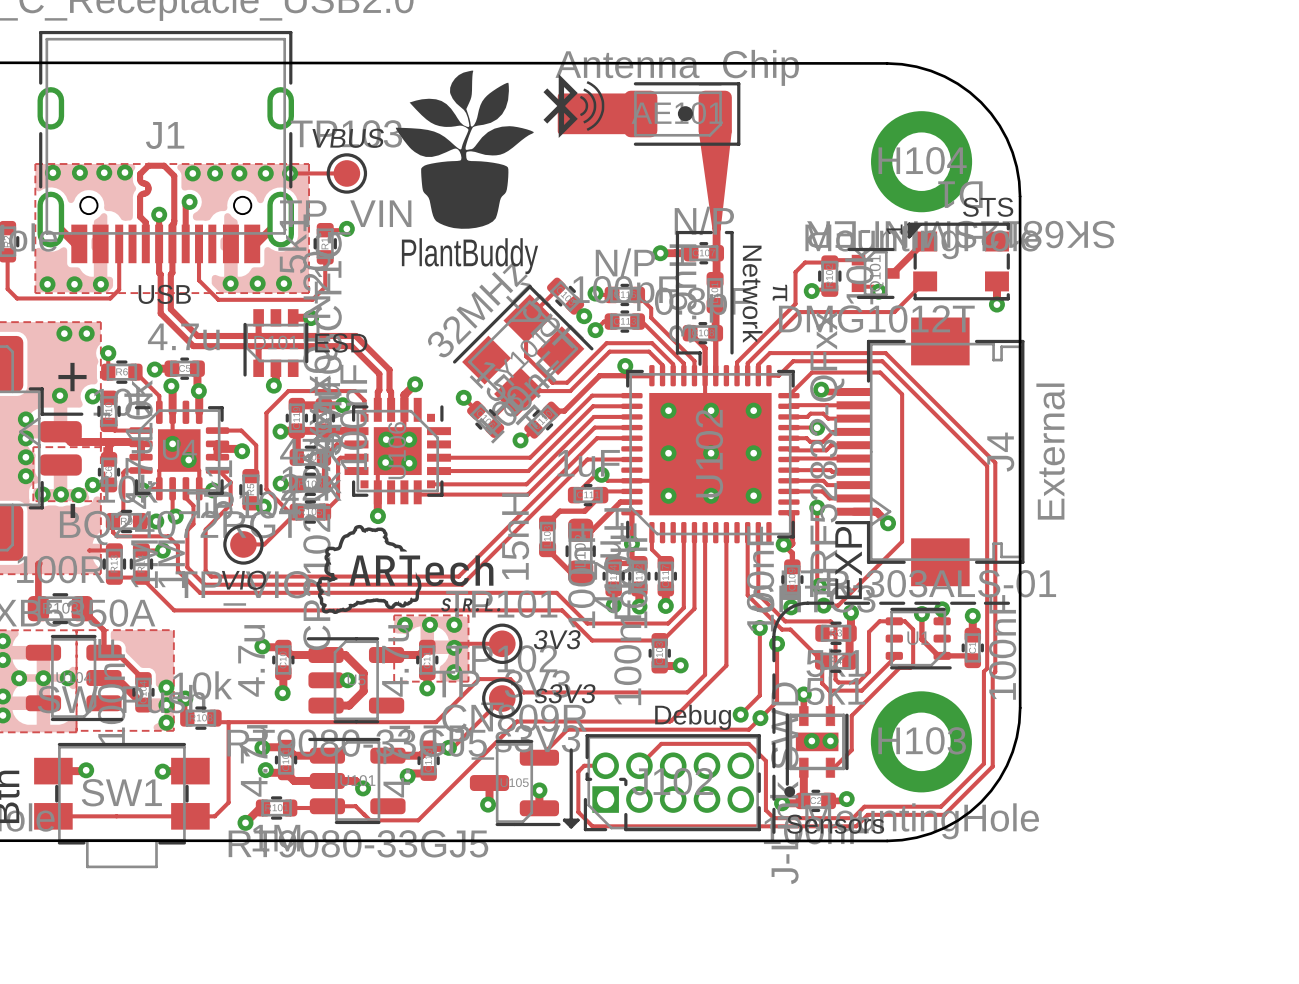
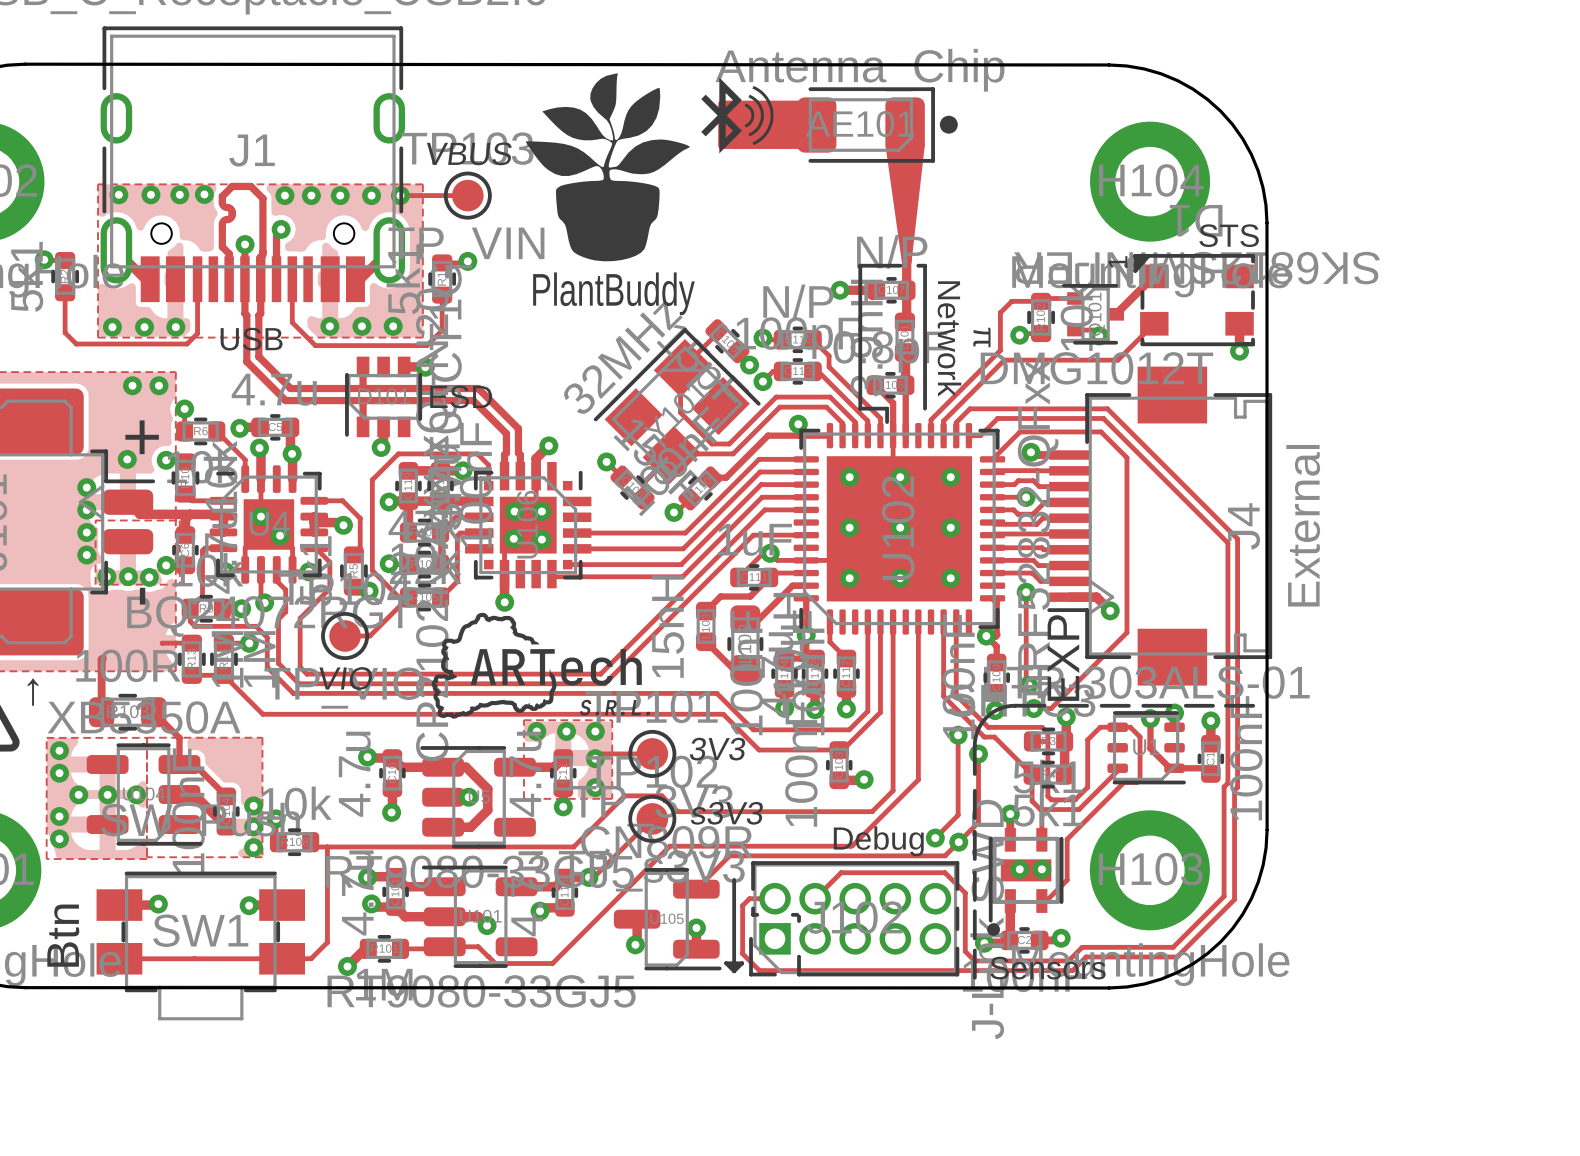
part footprint: [624, 82, 741, 146] -> [796, 87, 958, 163]

